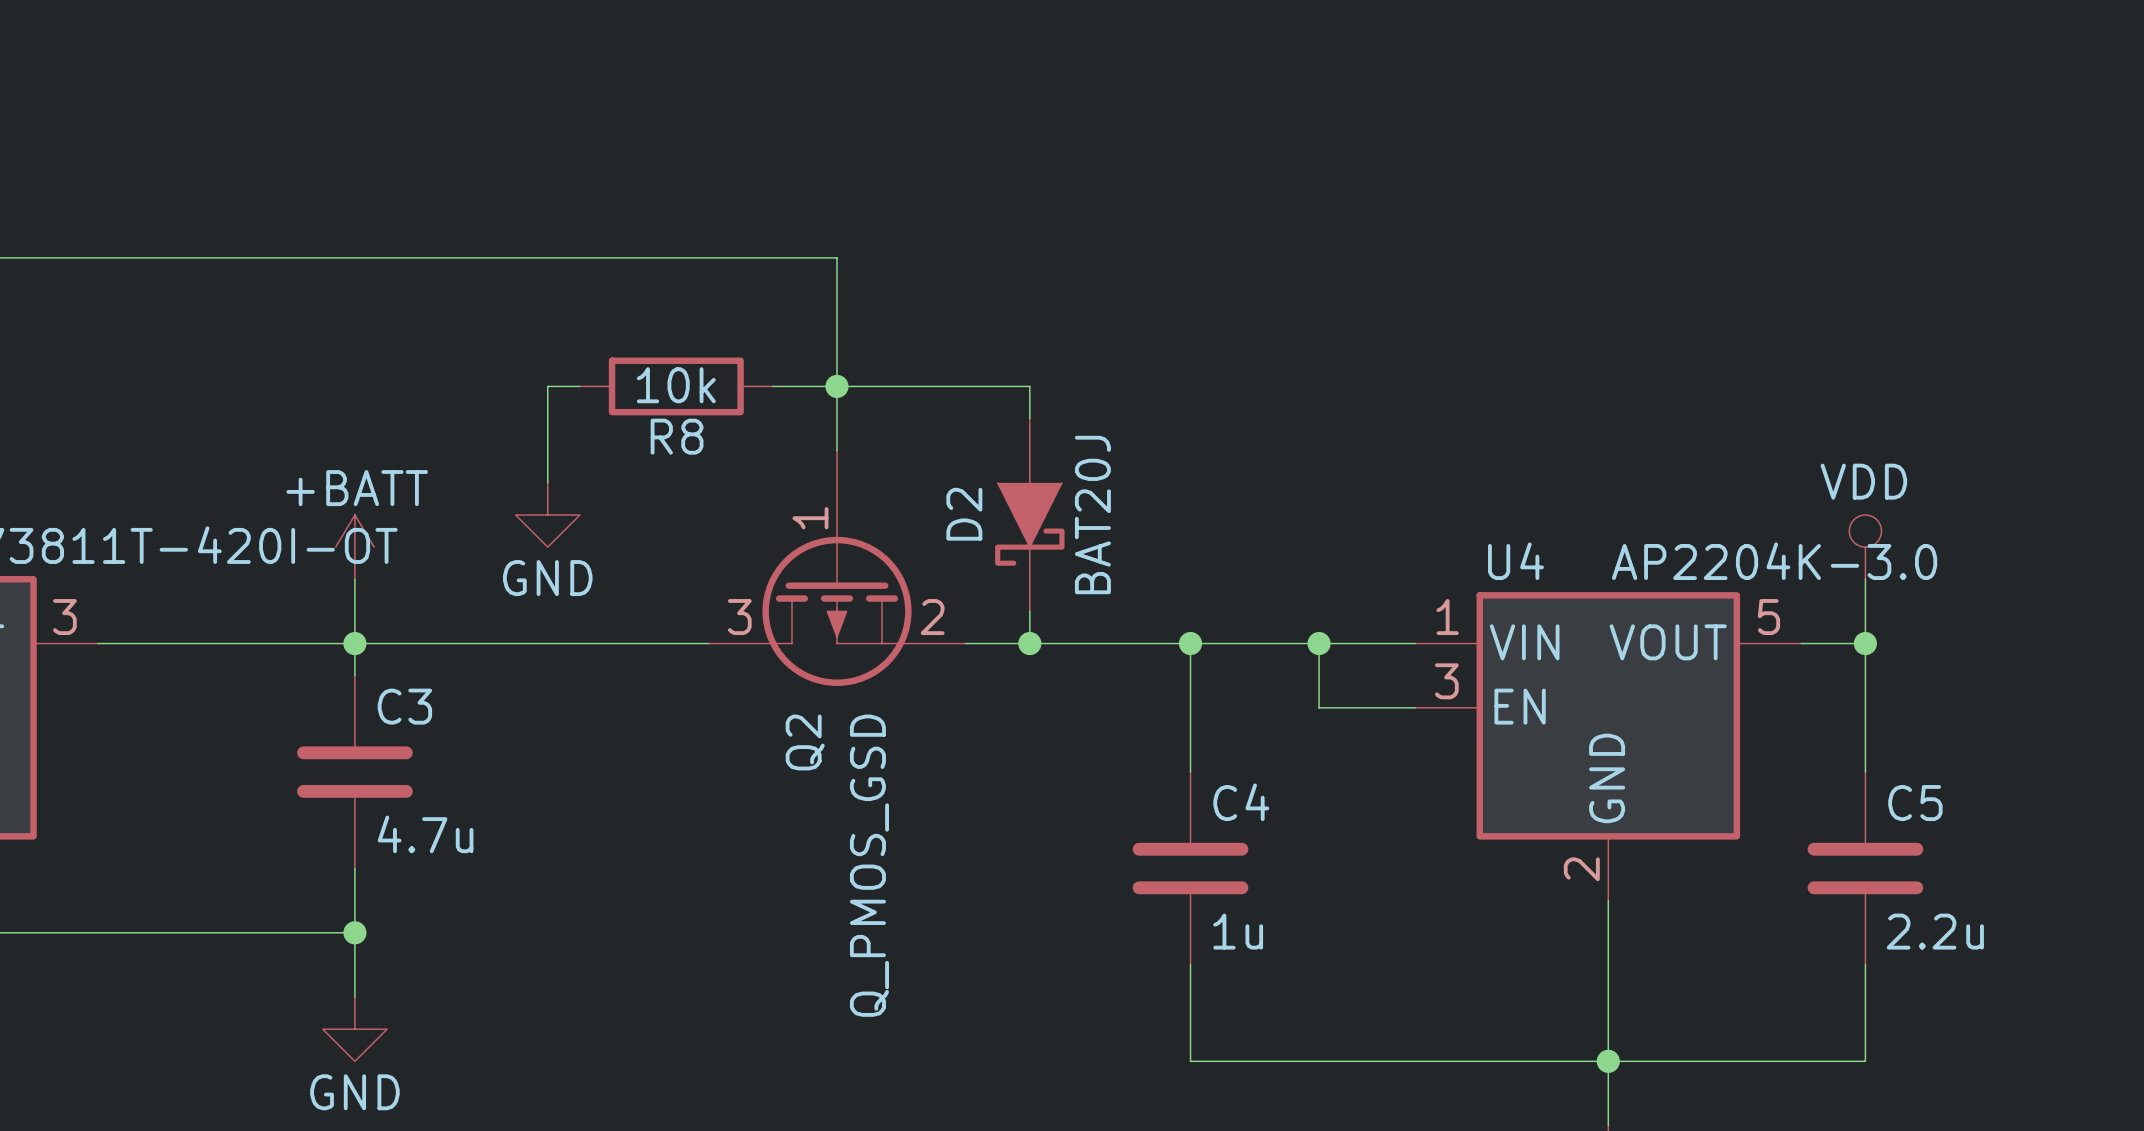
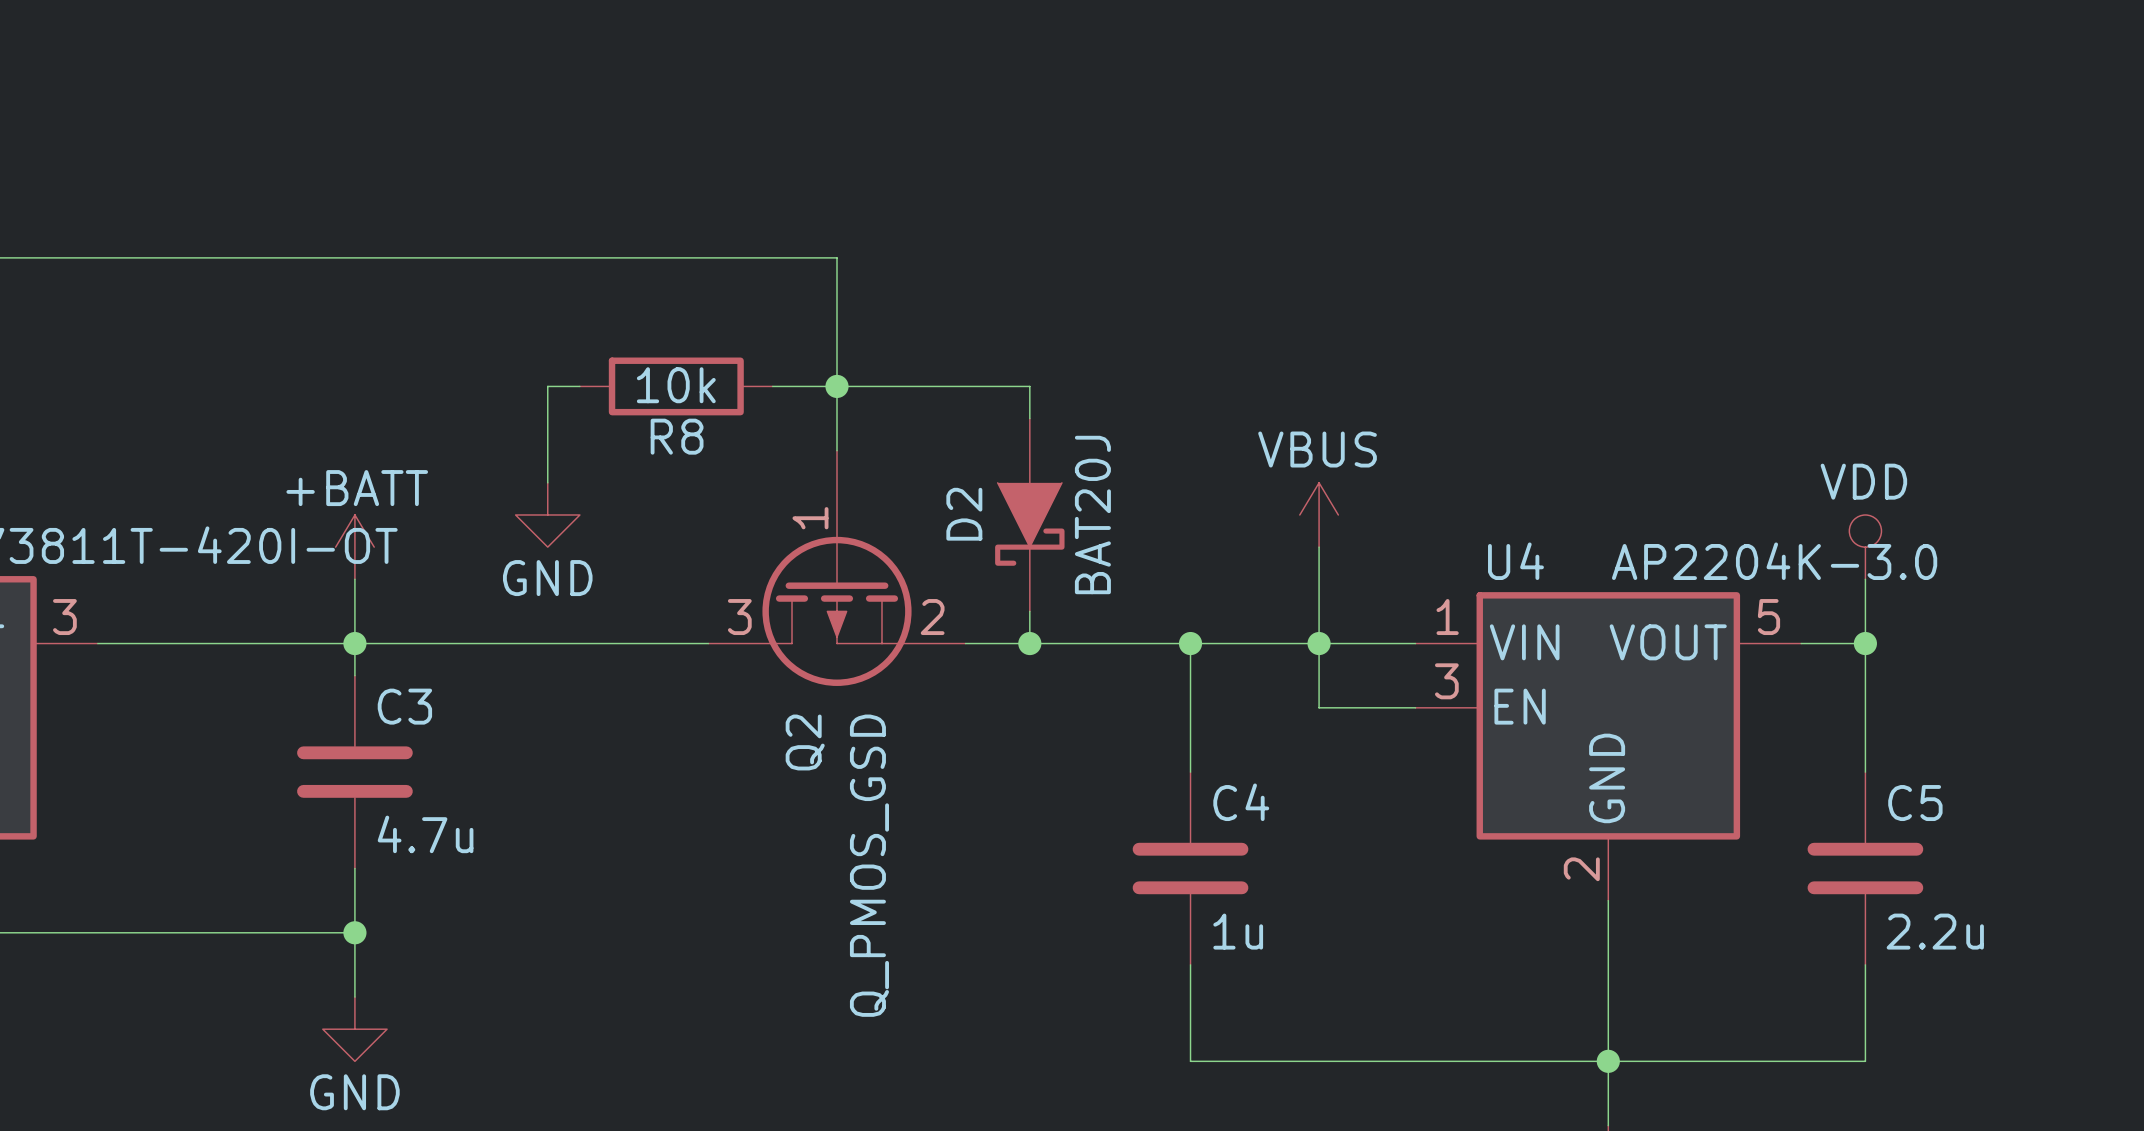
power symbol: none -> VBUS (1319, 514)
wire: none -> (1319, 547) (1319, 643)

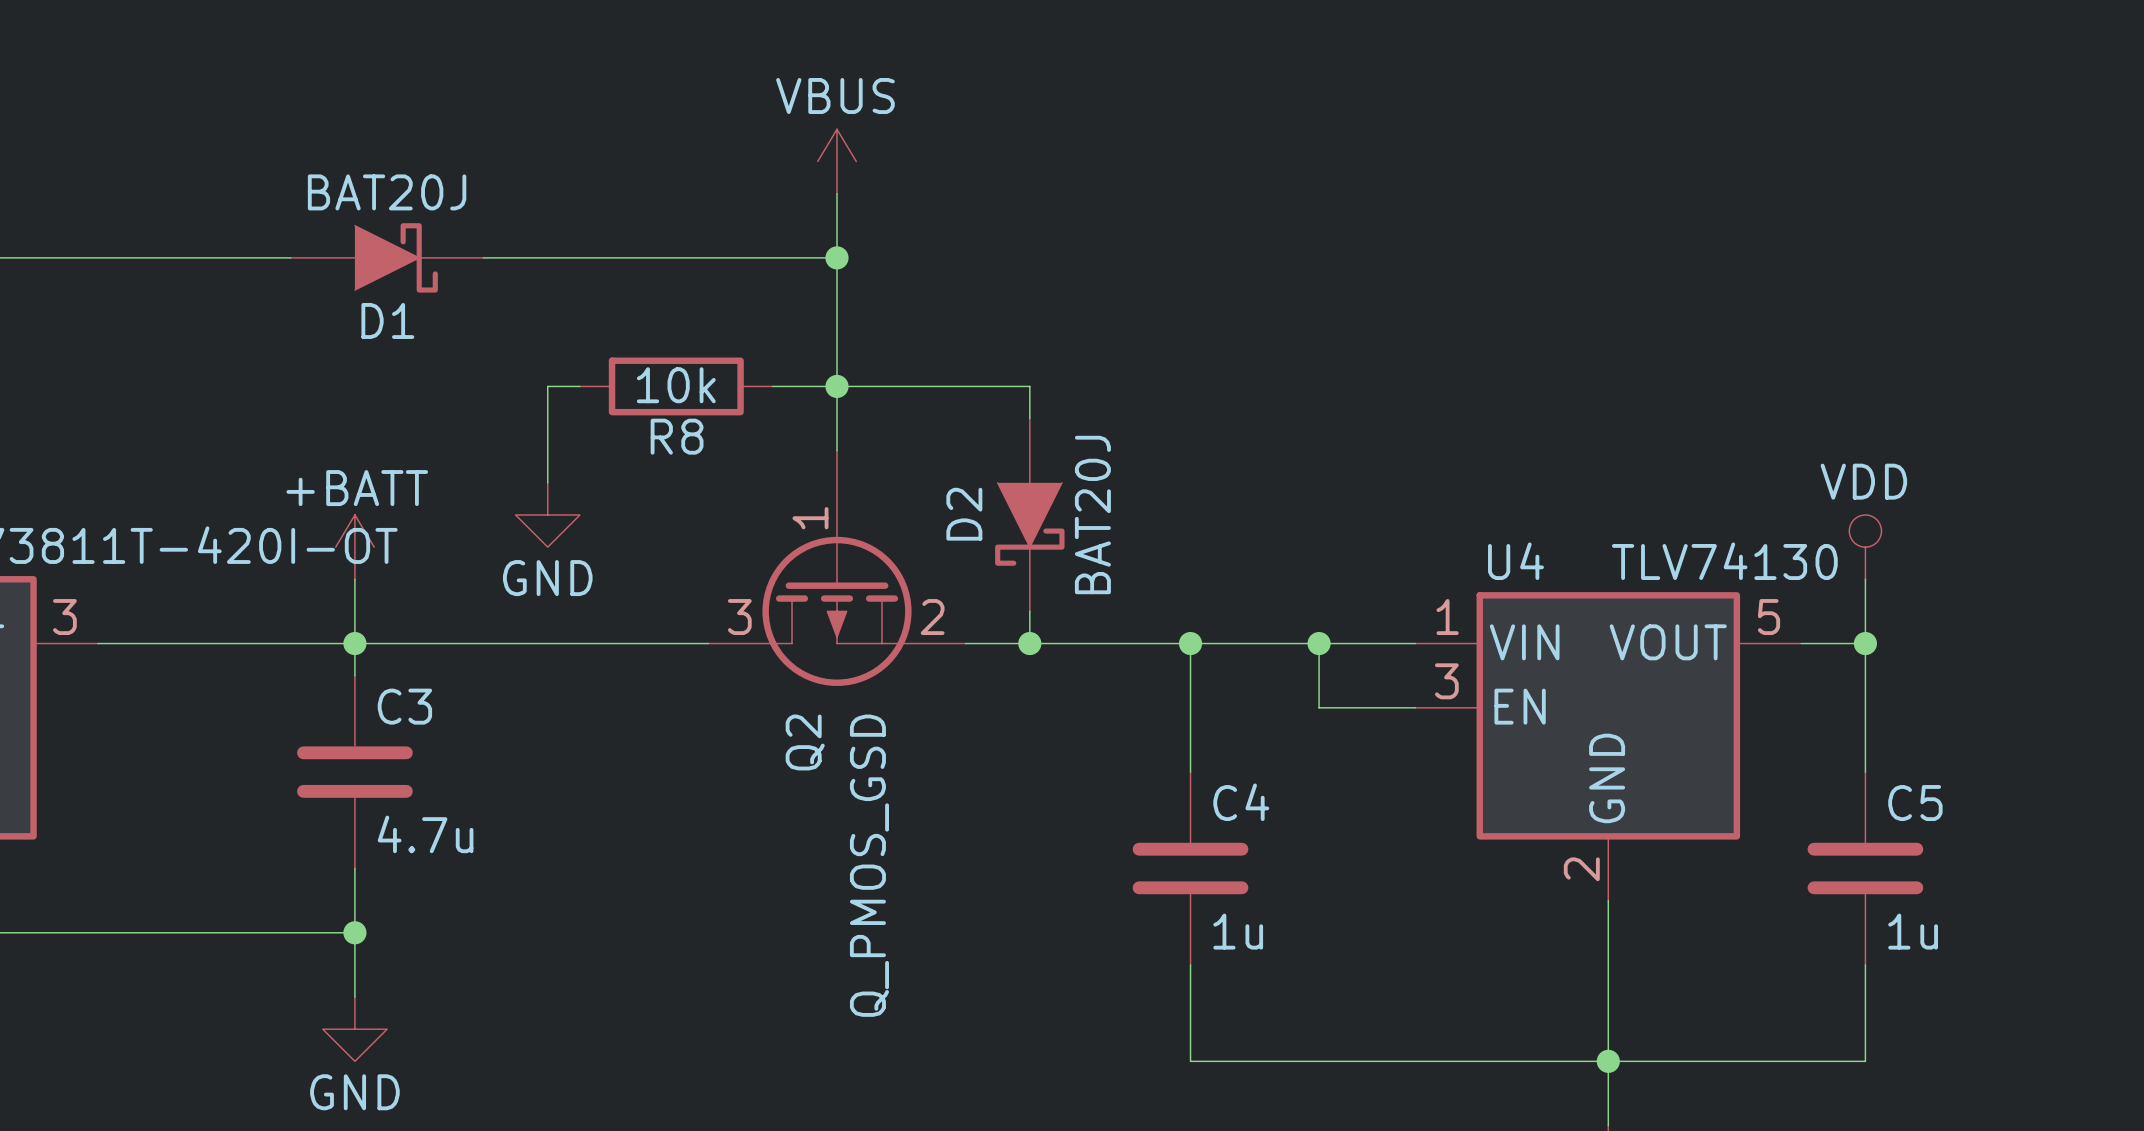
wire: none -> (837, 193) (837, 257)
D1: none -> BAT20J (387, 257)
junction: none -> (837, 257)
power symbol position: VBUS (1319, 514) -> VBUS (837, 161)
wire: (1319, 547) (1319, 643) -> none
U4 value: AP2204K-3.0 (1774, 561) -> TLV74130 (1724, 561)
C5 value: 2.2u (1935, 931) -> 1u (1913, 931)

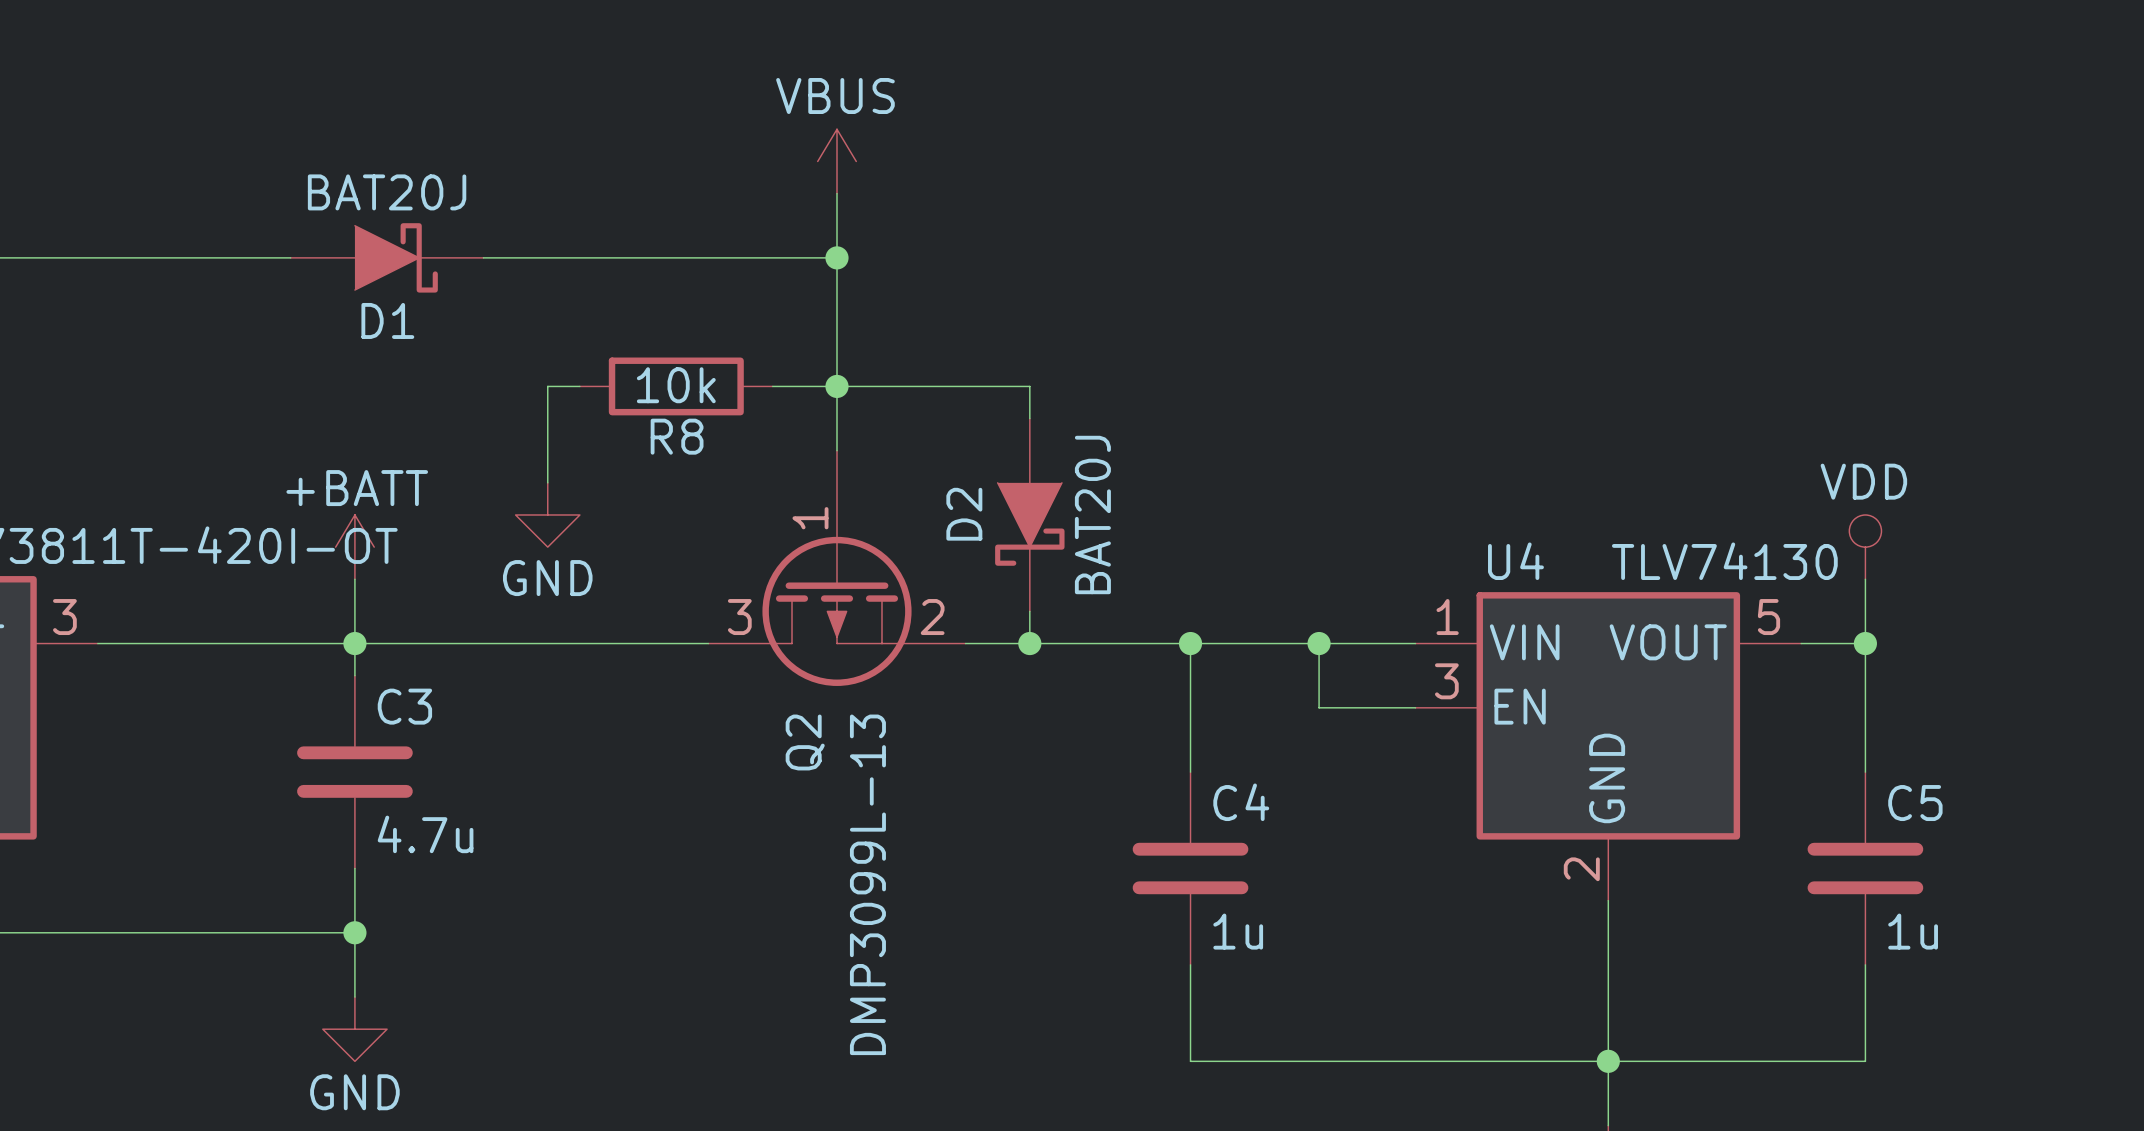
Q2 value: Q_PMOS_GSD (869, 865) -> DMP3099L-13 (867, 884)

